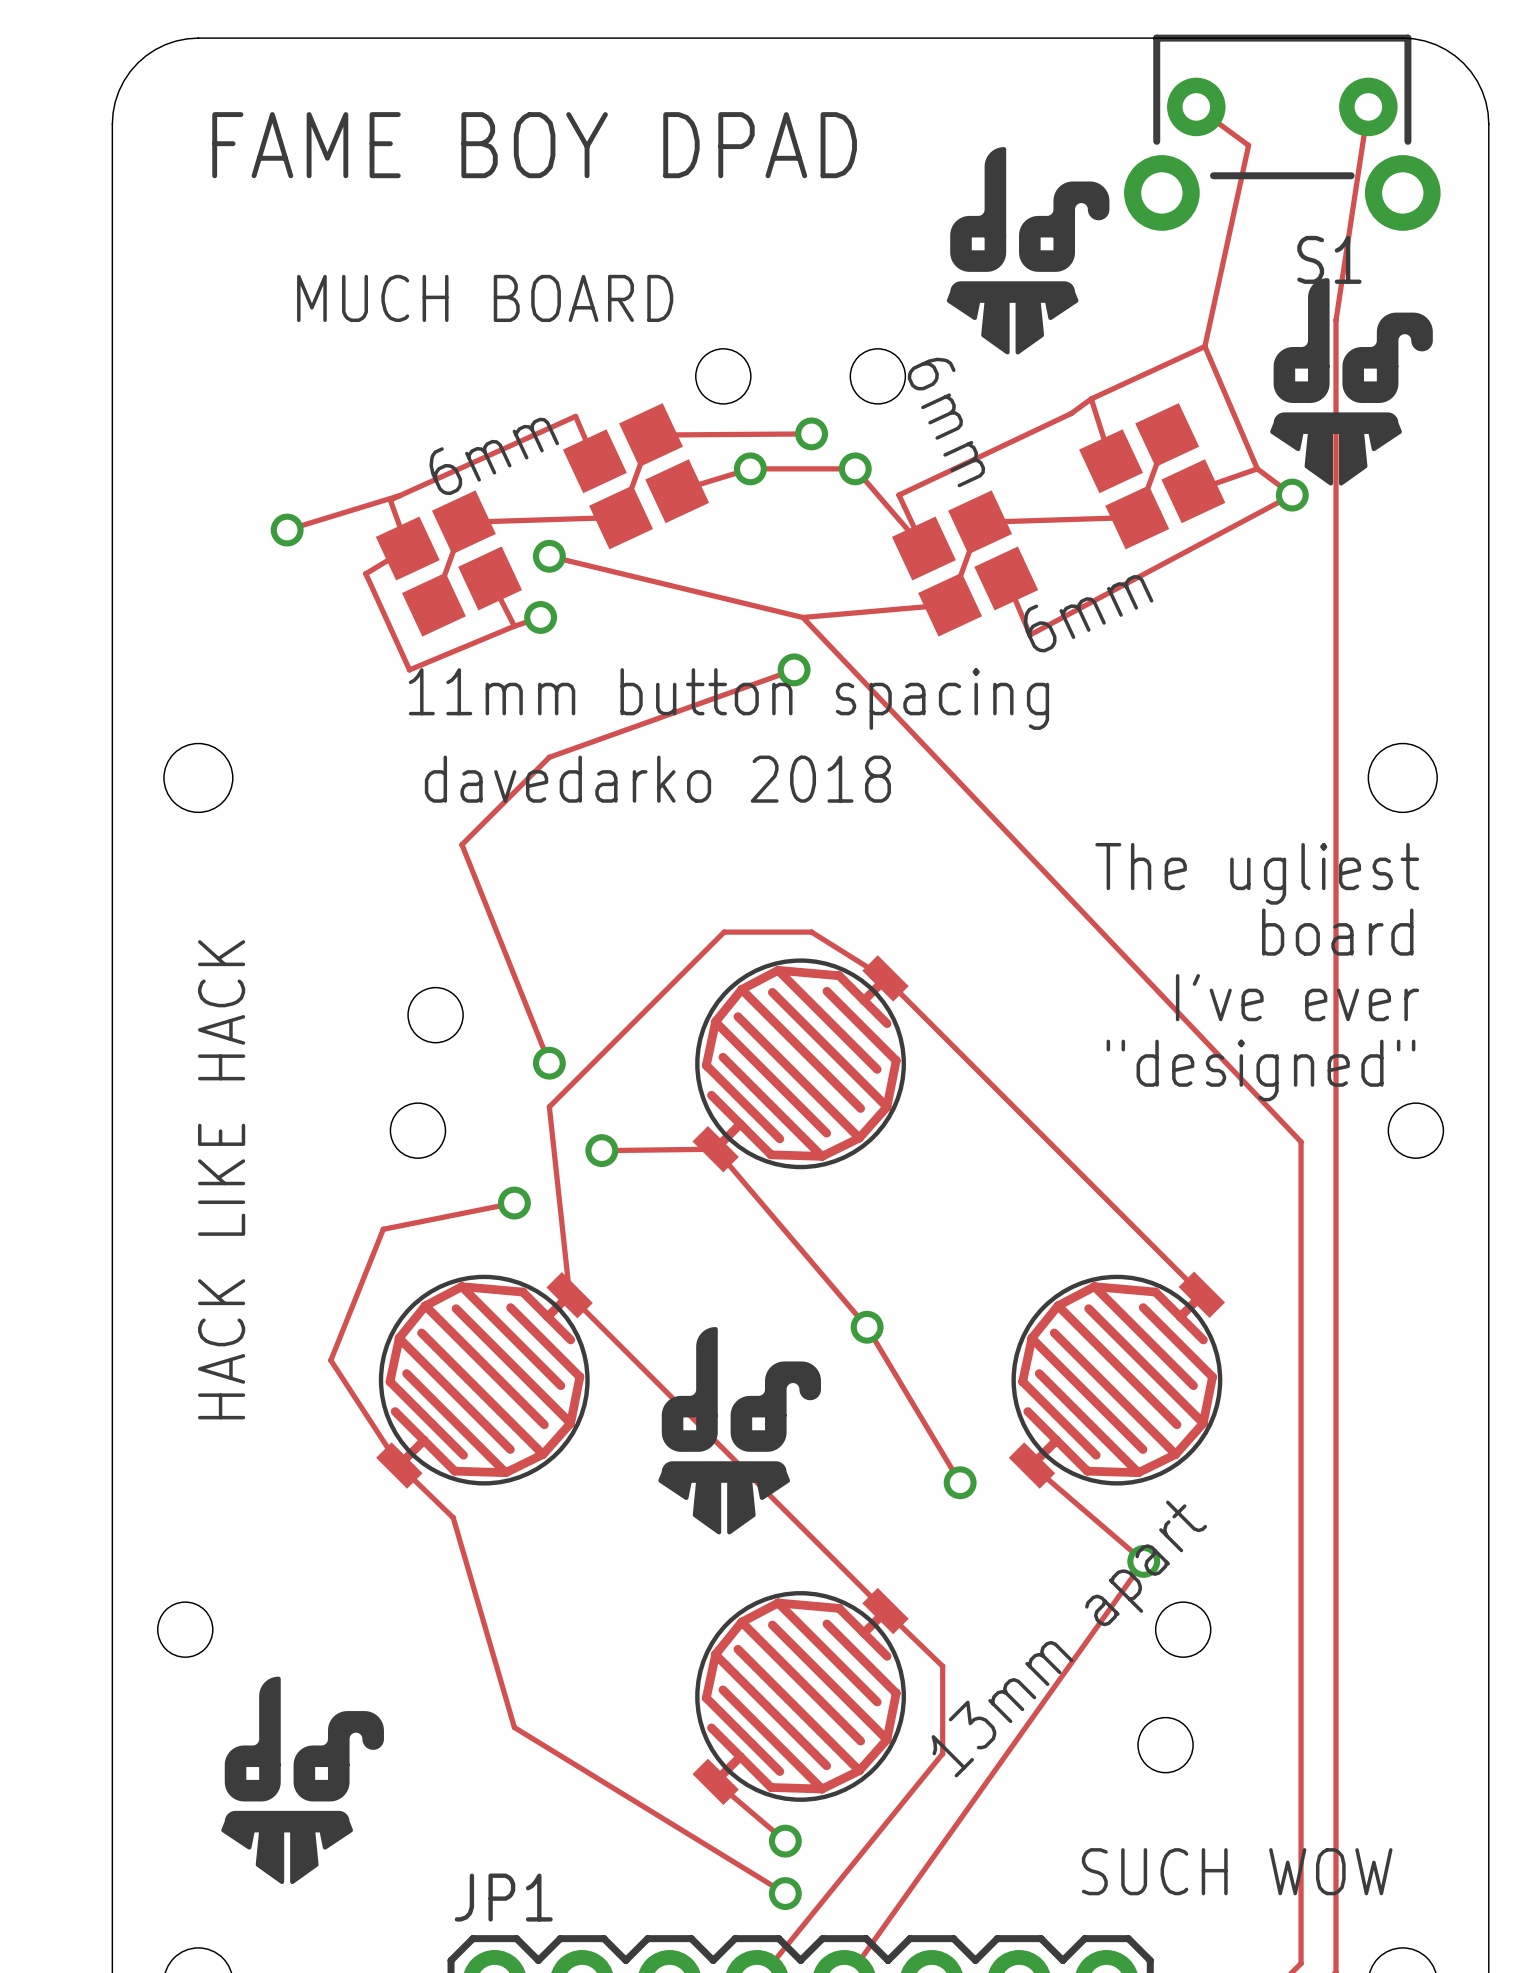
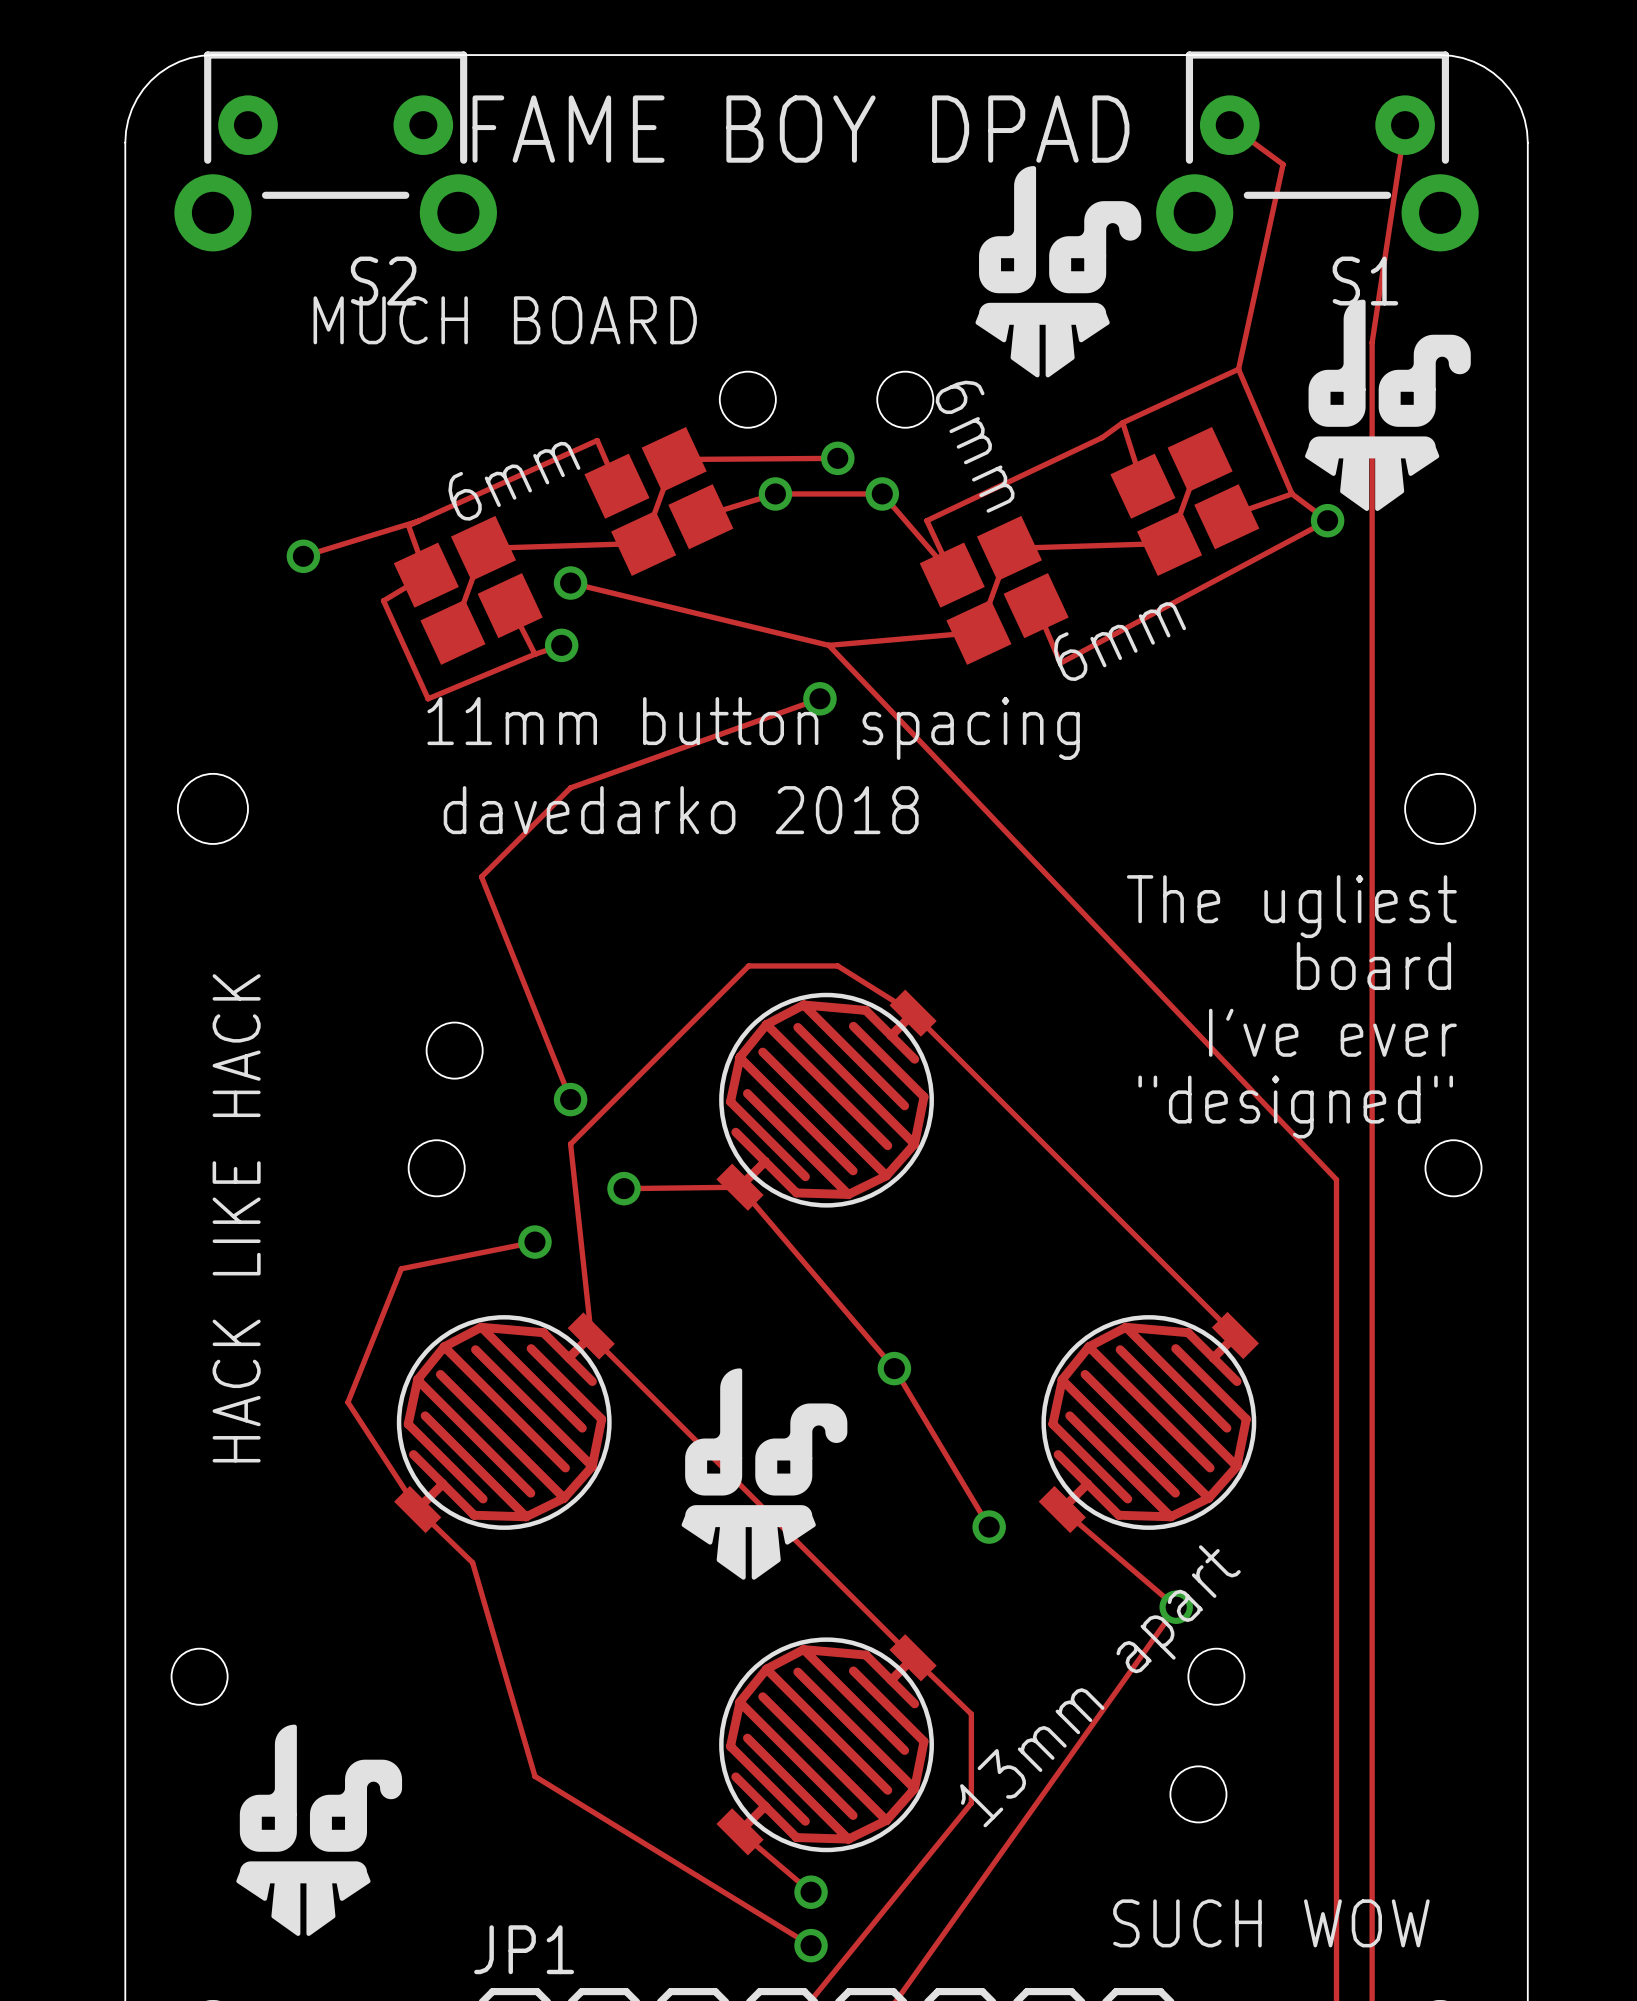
S2: none -> (335, 151)
text position: FAME BOY DPAD (534, 145) -> FAME BOY DPAD (800, 129)

